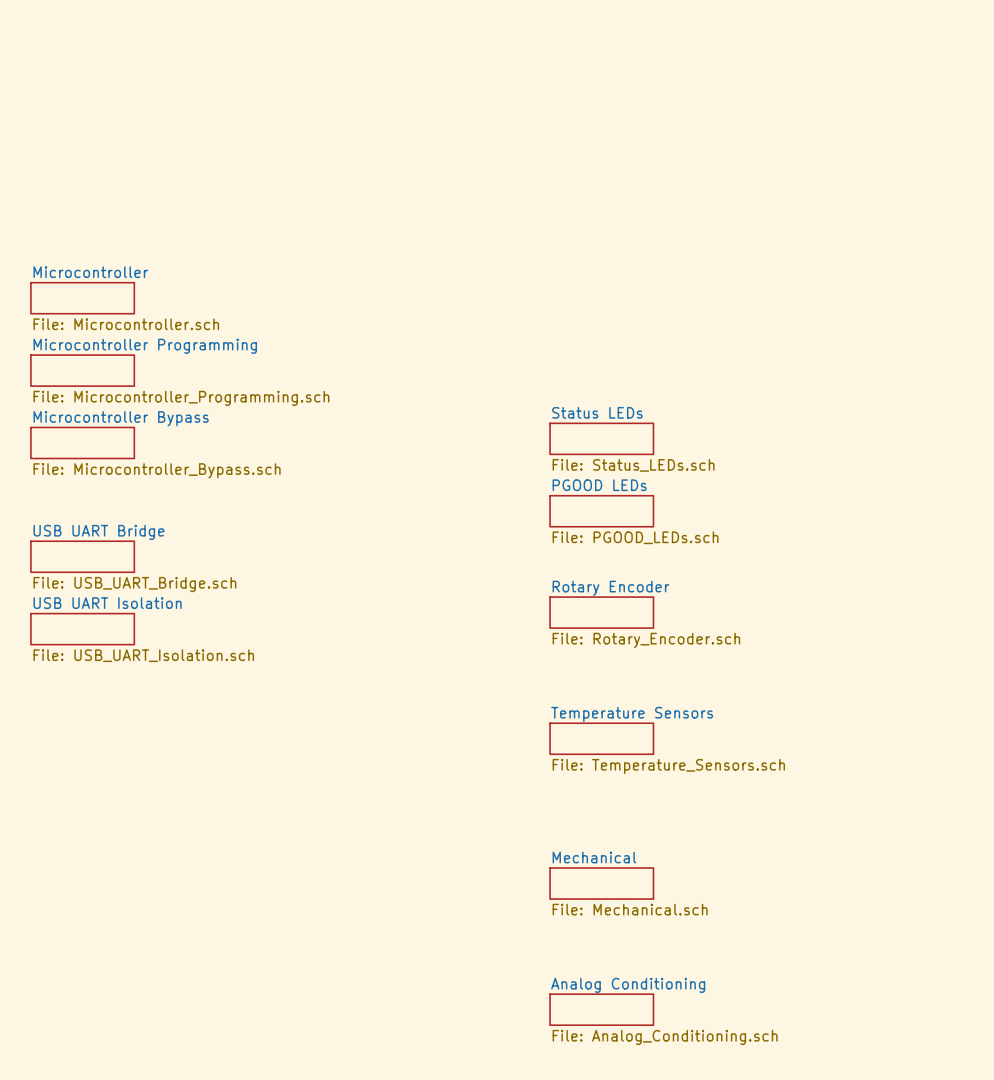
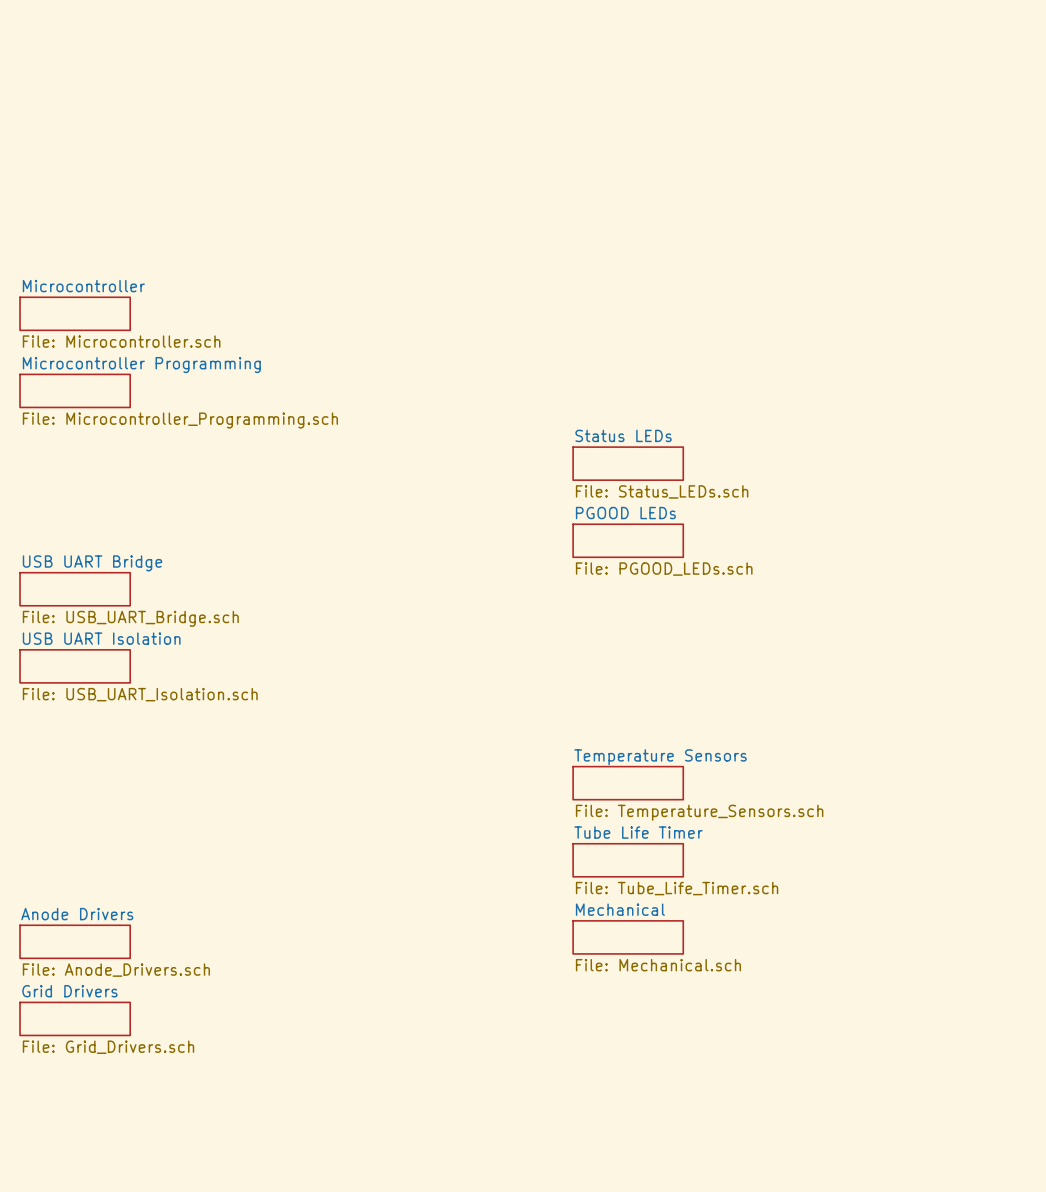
sheet Microcontroller Bypass: File: Microcontroller_Bypass.sch (82, 442) -> none
sheet Rotary Encoder: File: Rotary_Encoder.sch (601, 612) -> none
sheet Tube Life Timer: none -> File: Tube_Life_Timer.sch (628, 860)
sheet Anode Drivers: none -> File: Anode_Drivers.sch (75, 941)
sheet Grid Drivers: none -> File: Grid_Drivers.sch (75, 1018)
sheet Analog Conditioning: File: Analog_Conditioning.sch (601, 1009) -> none

